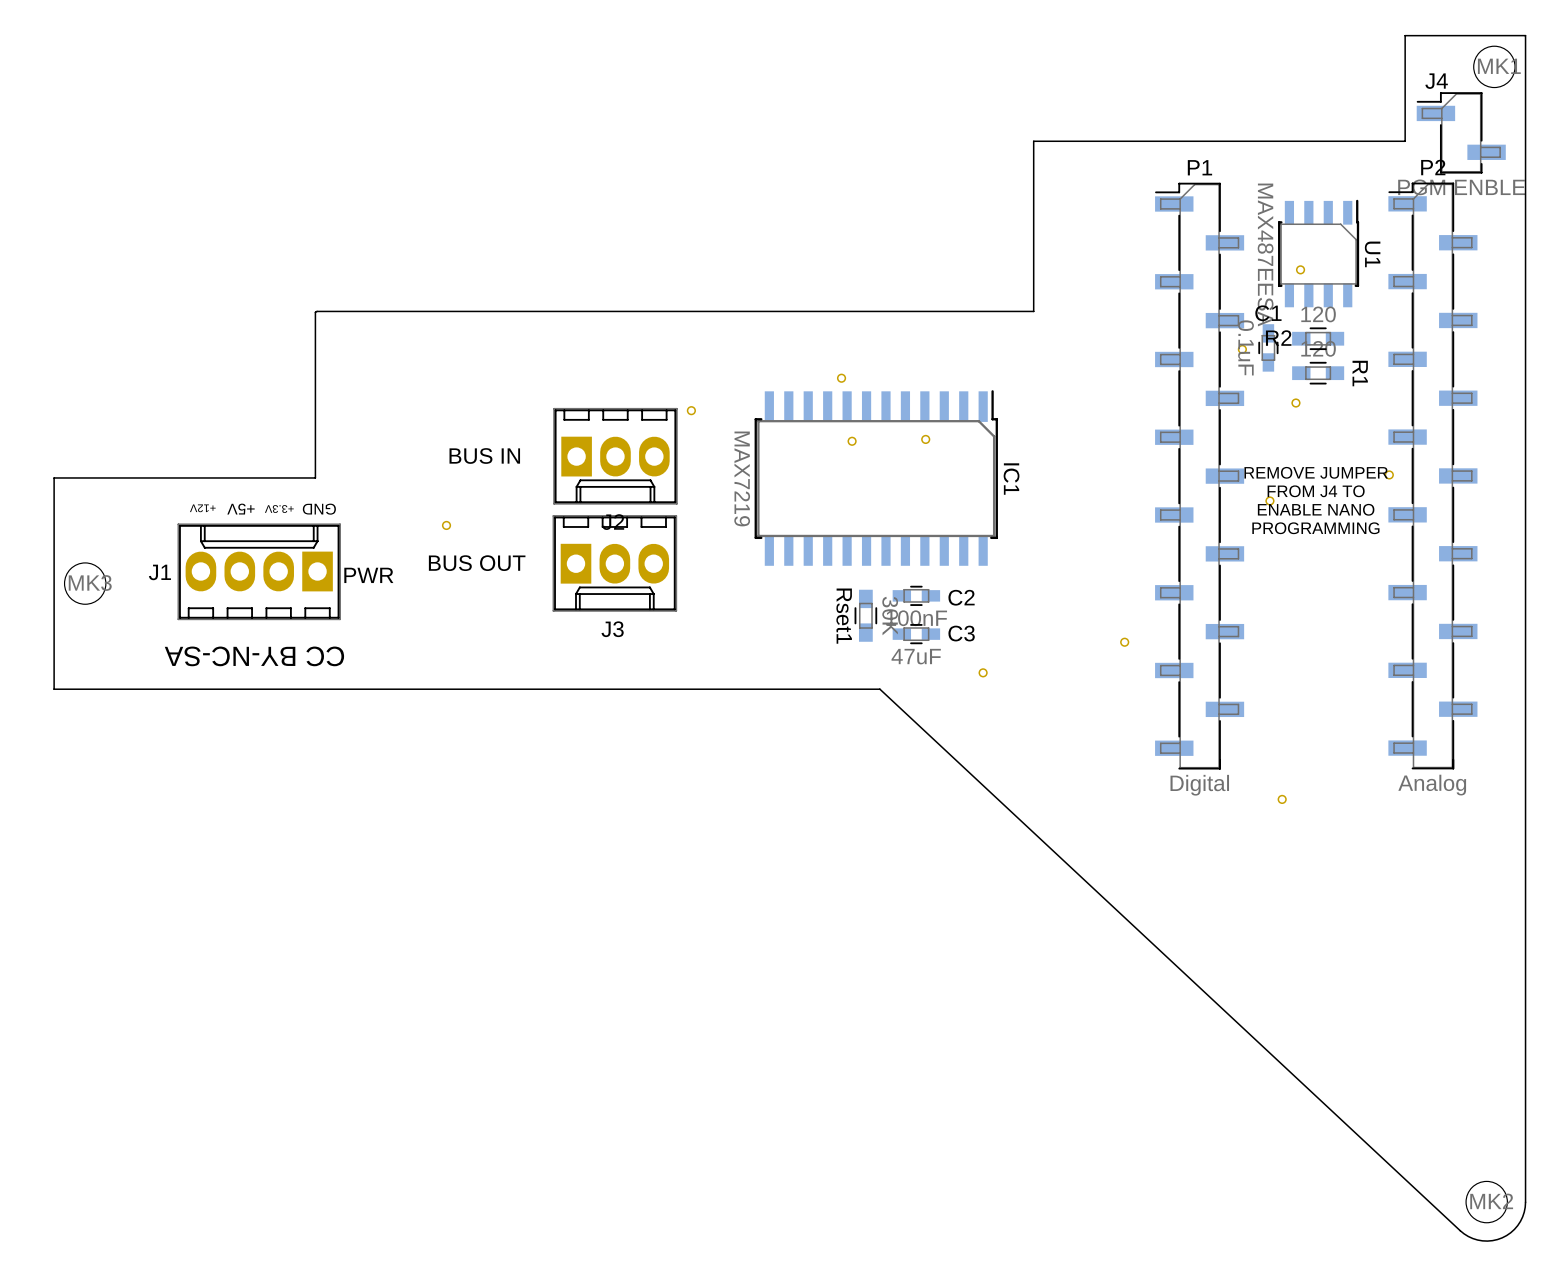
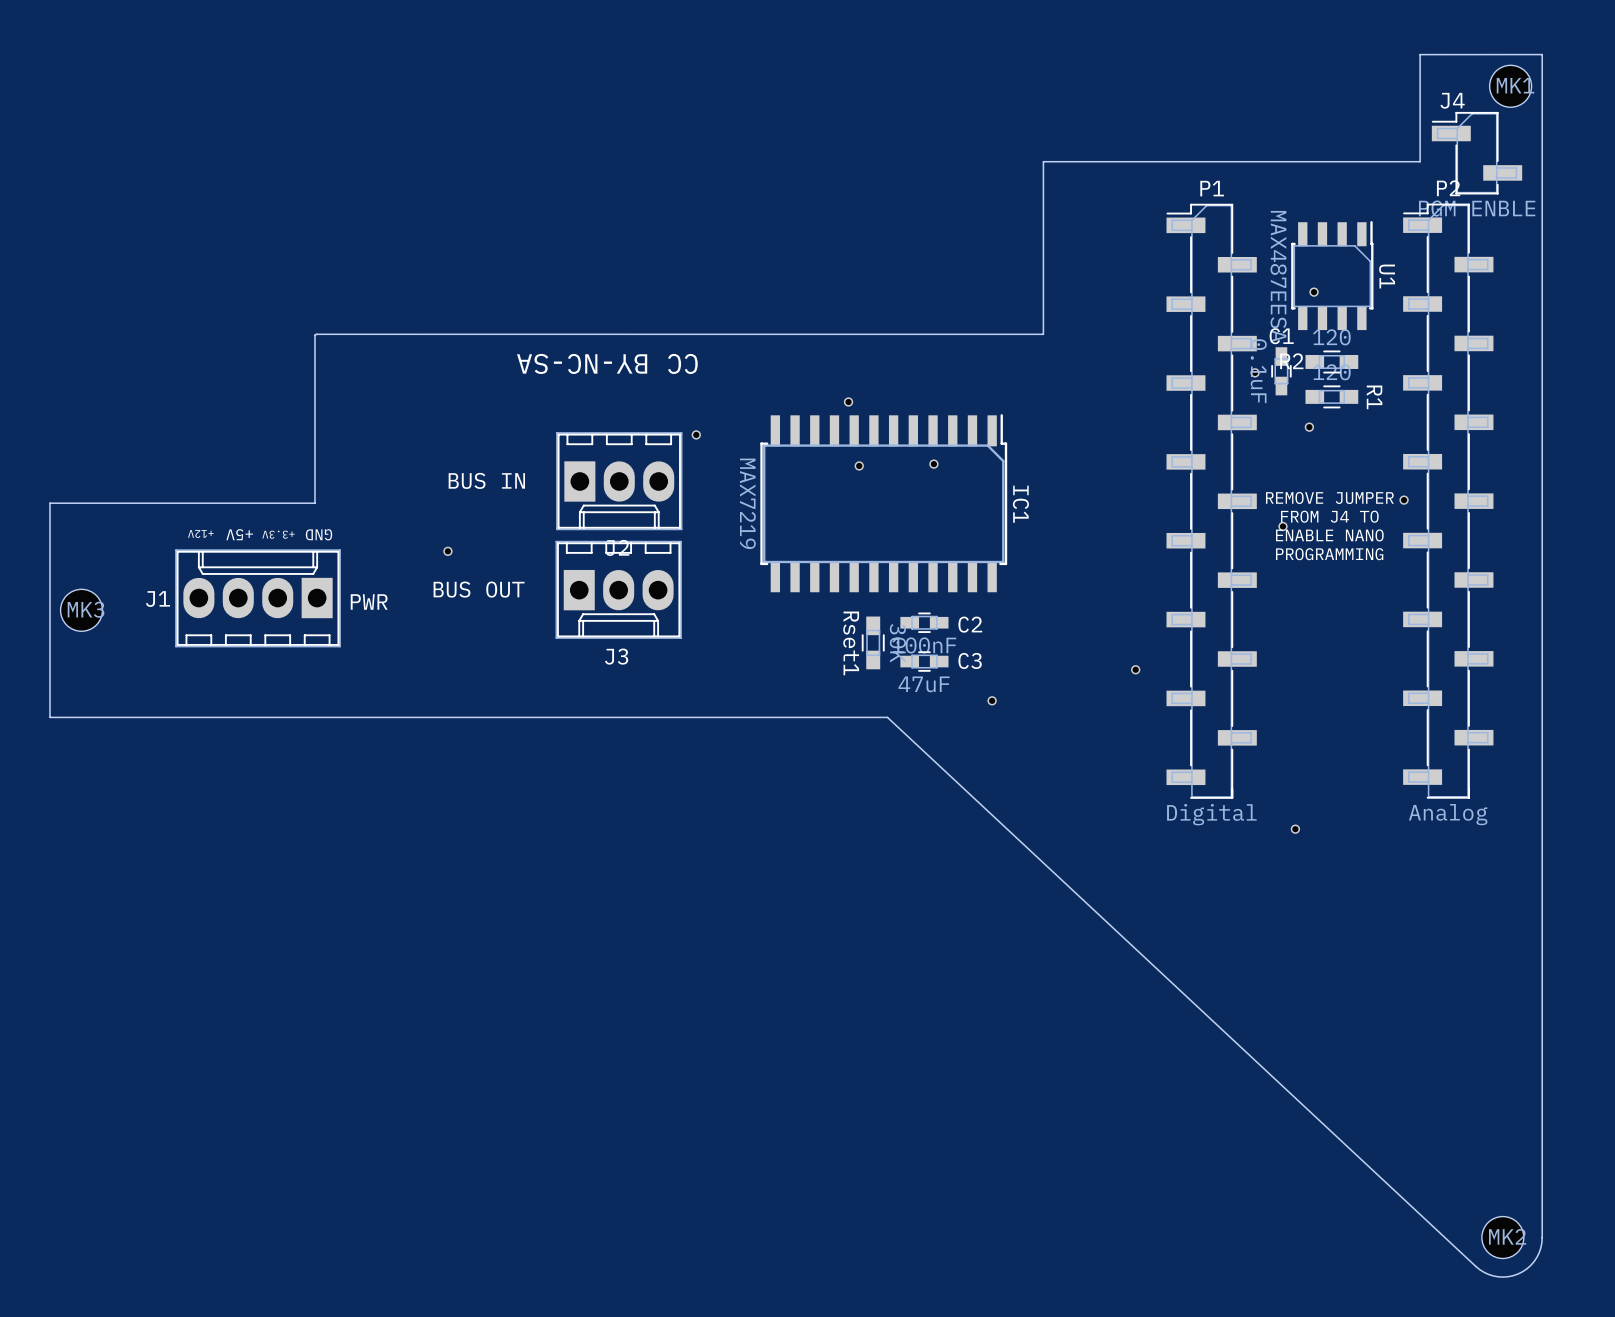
text: none -> CC BY-NC-SA (607, 363)
text: CC BY-NC-SA (254, 656) -> none

